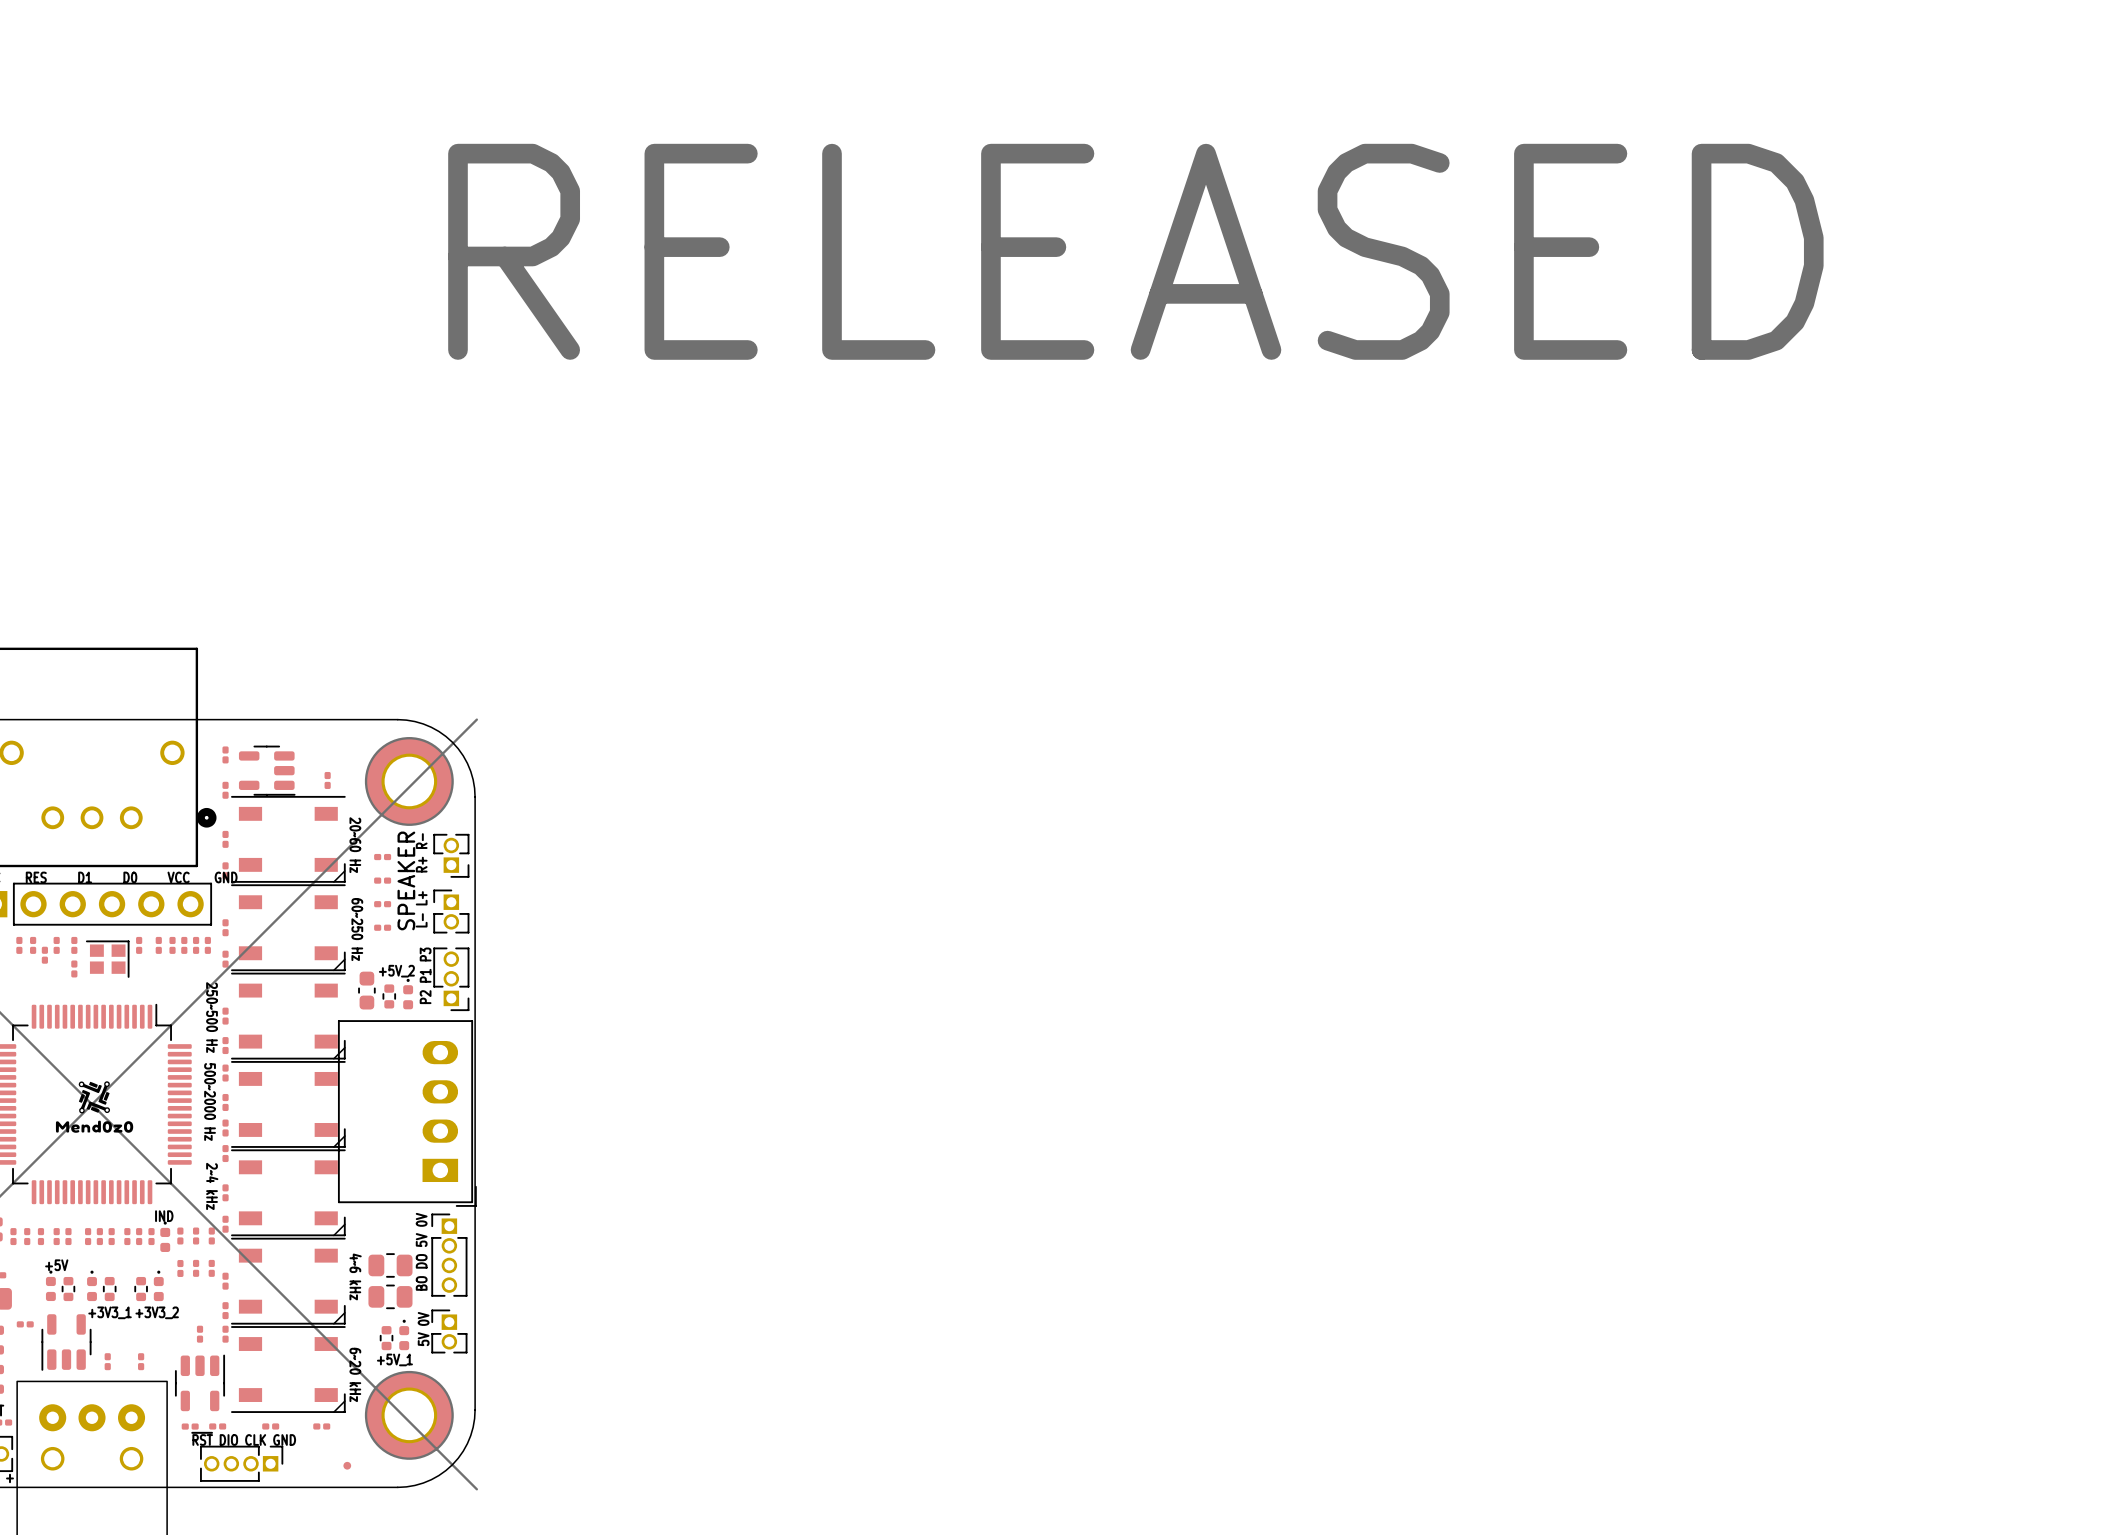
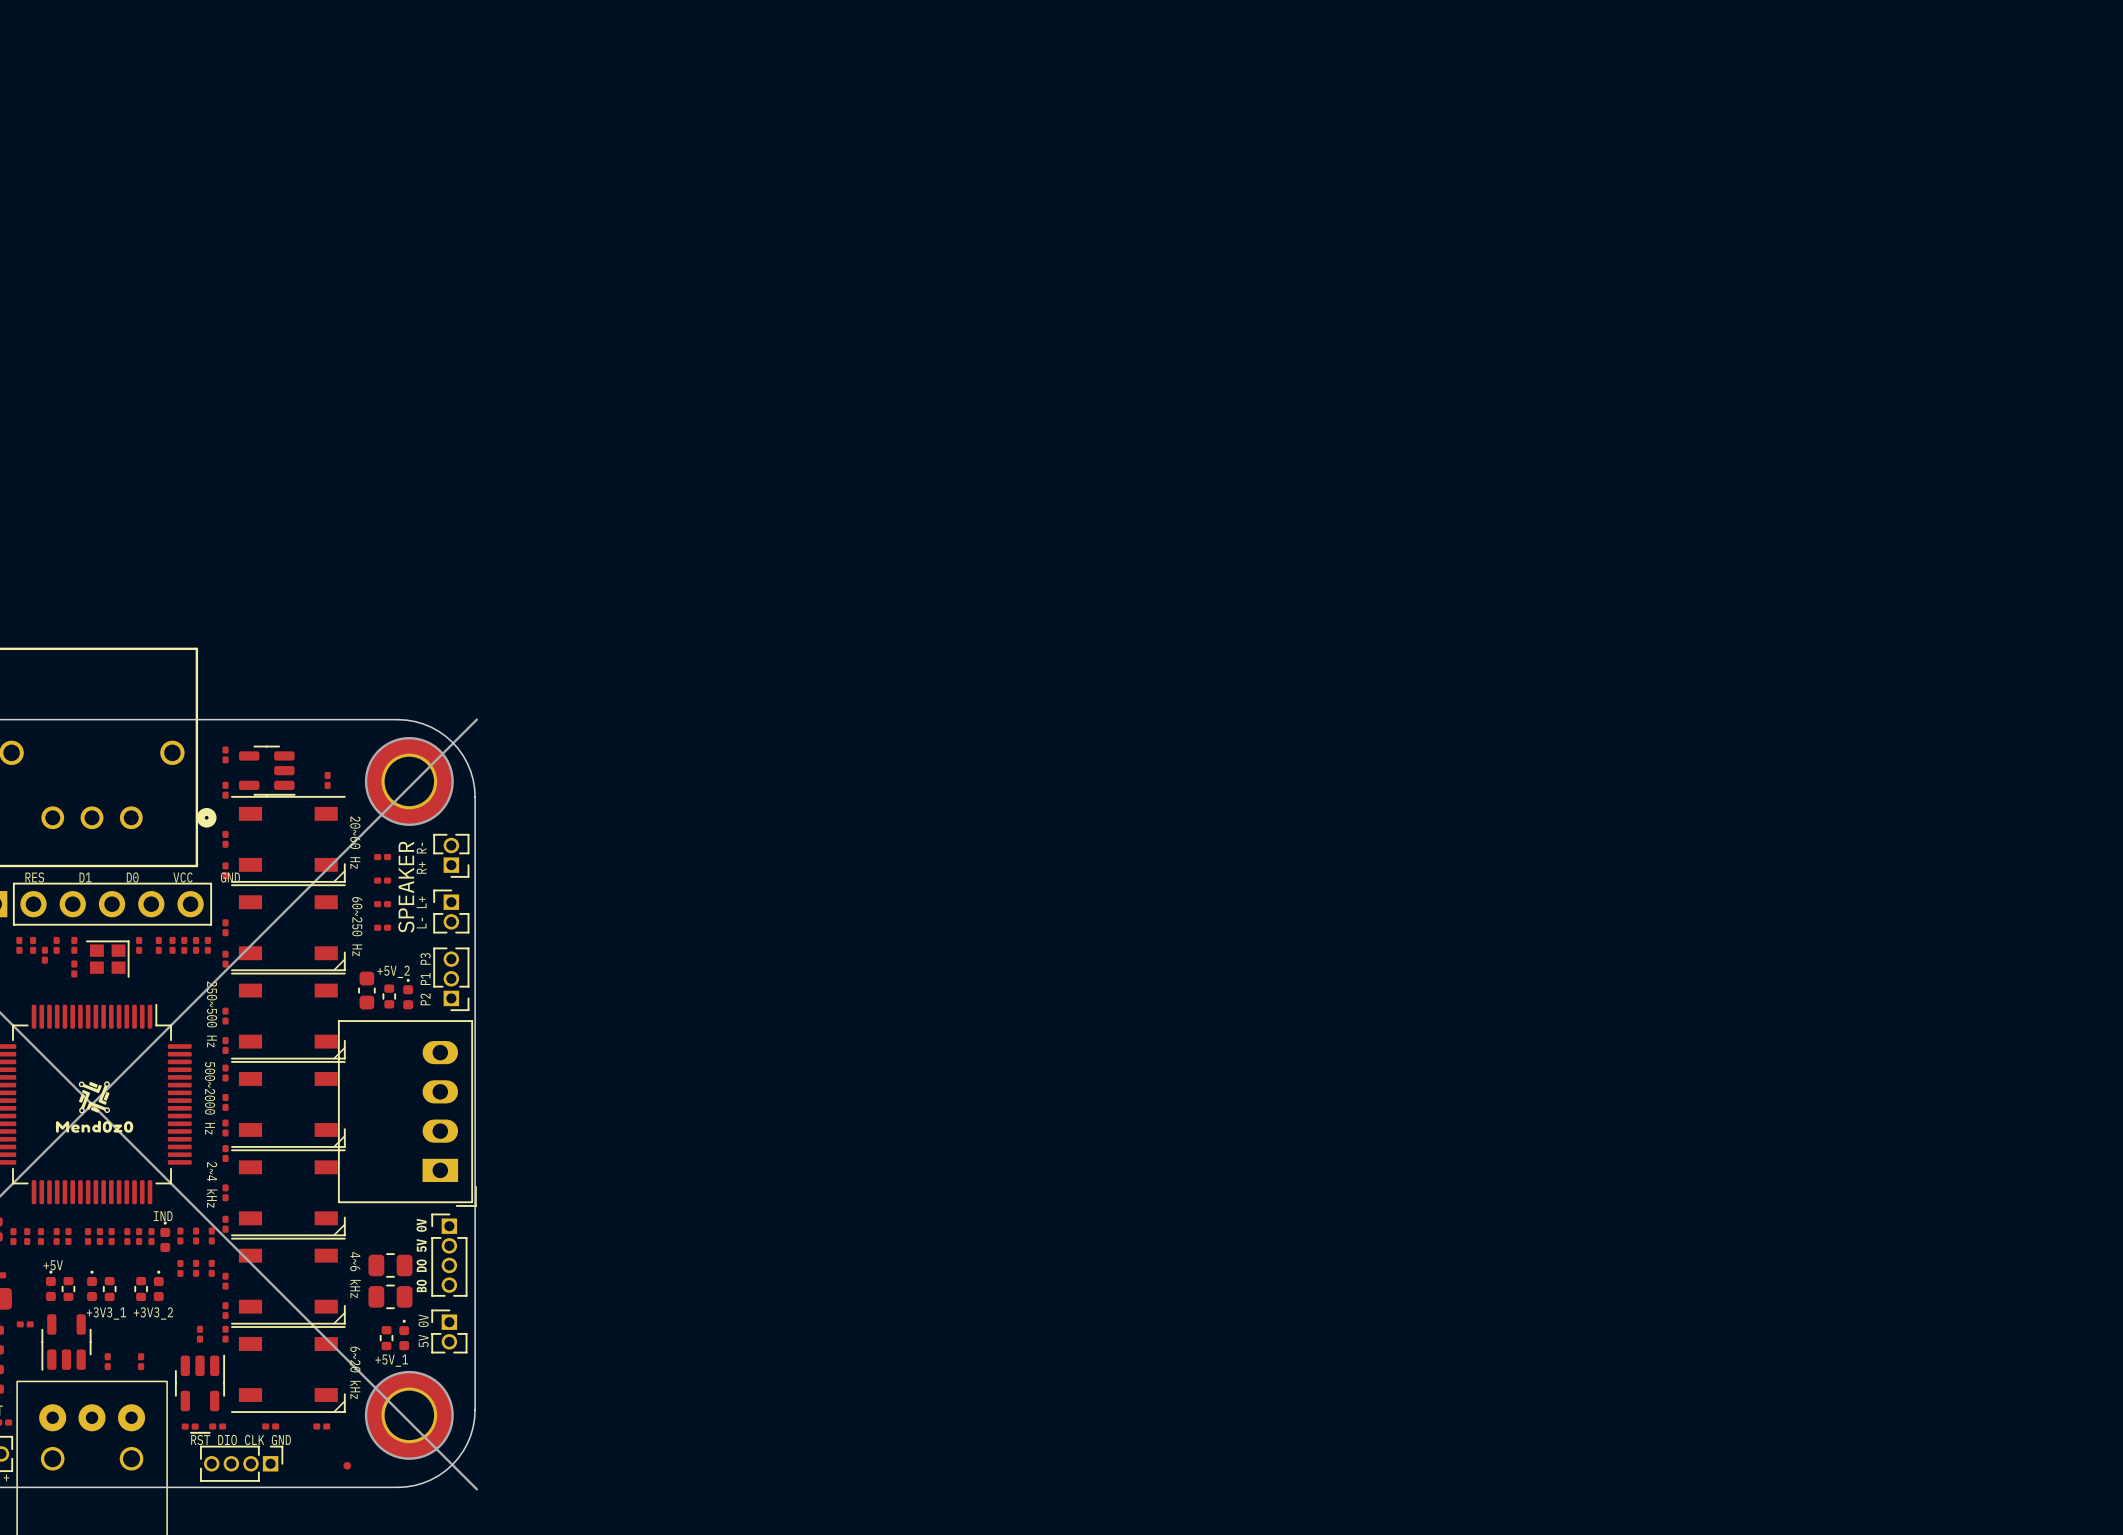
text: RELEASED (1135, 251) -> none

